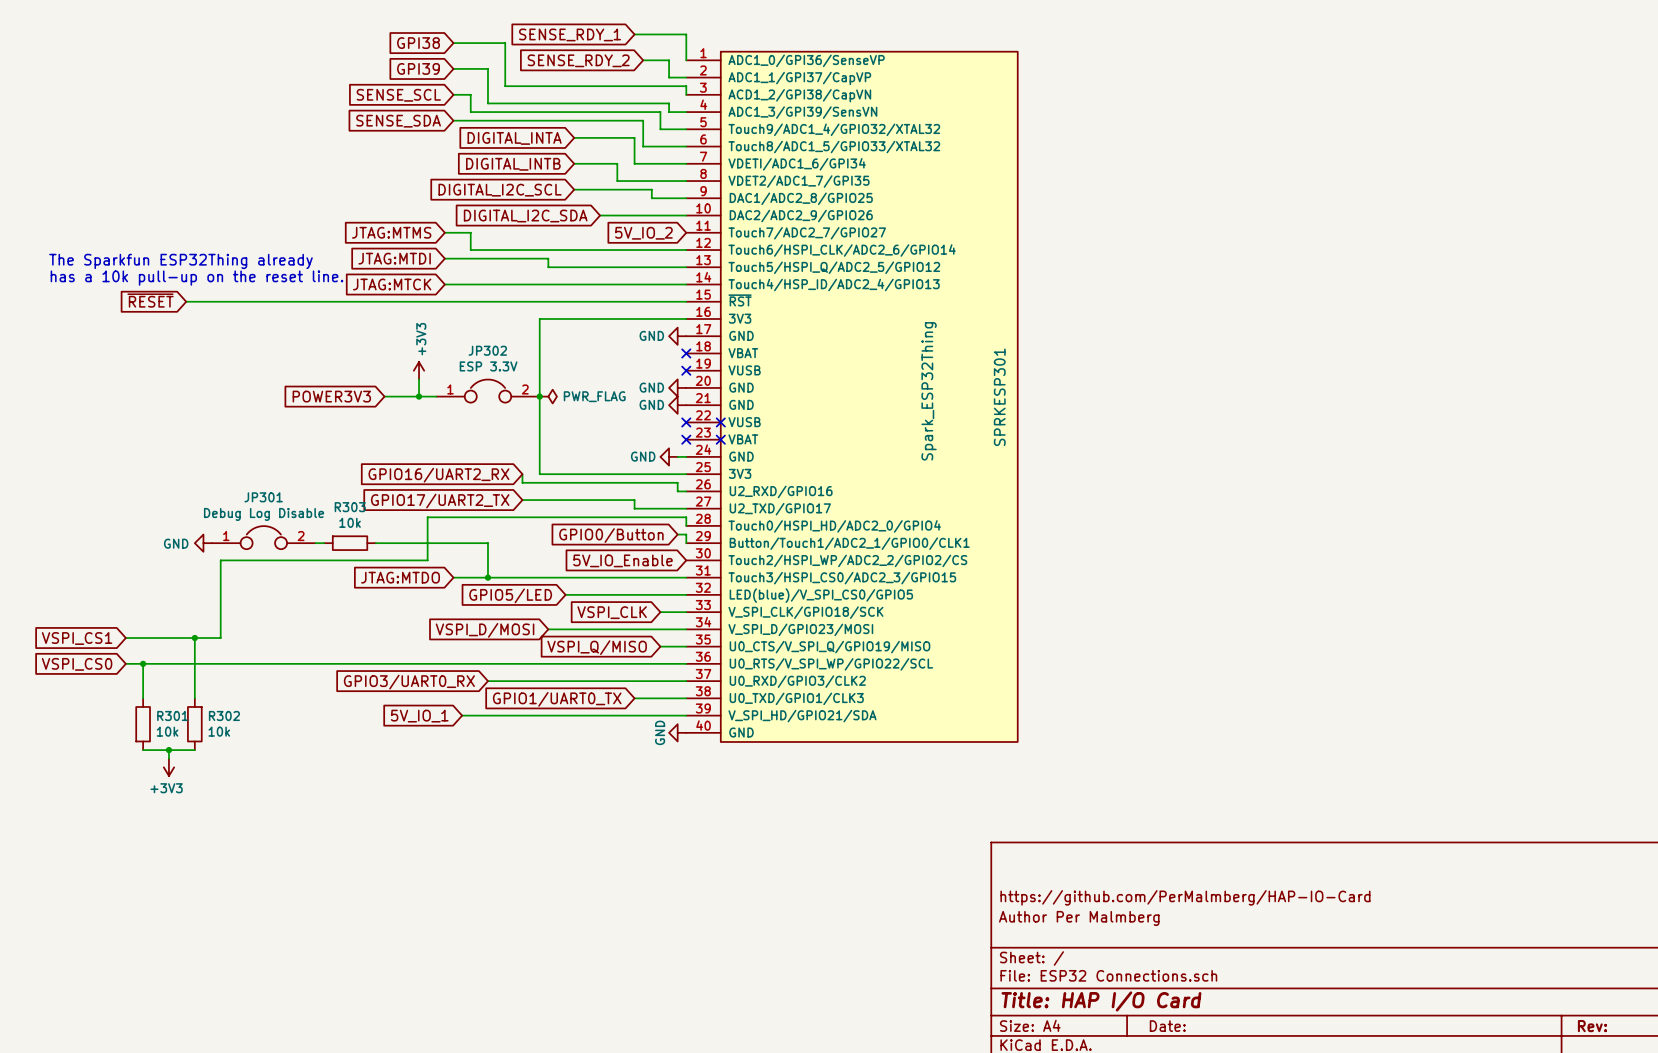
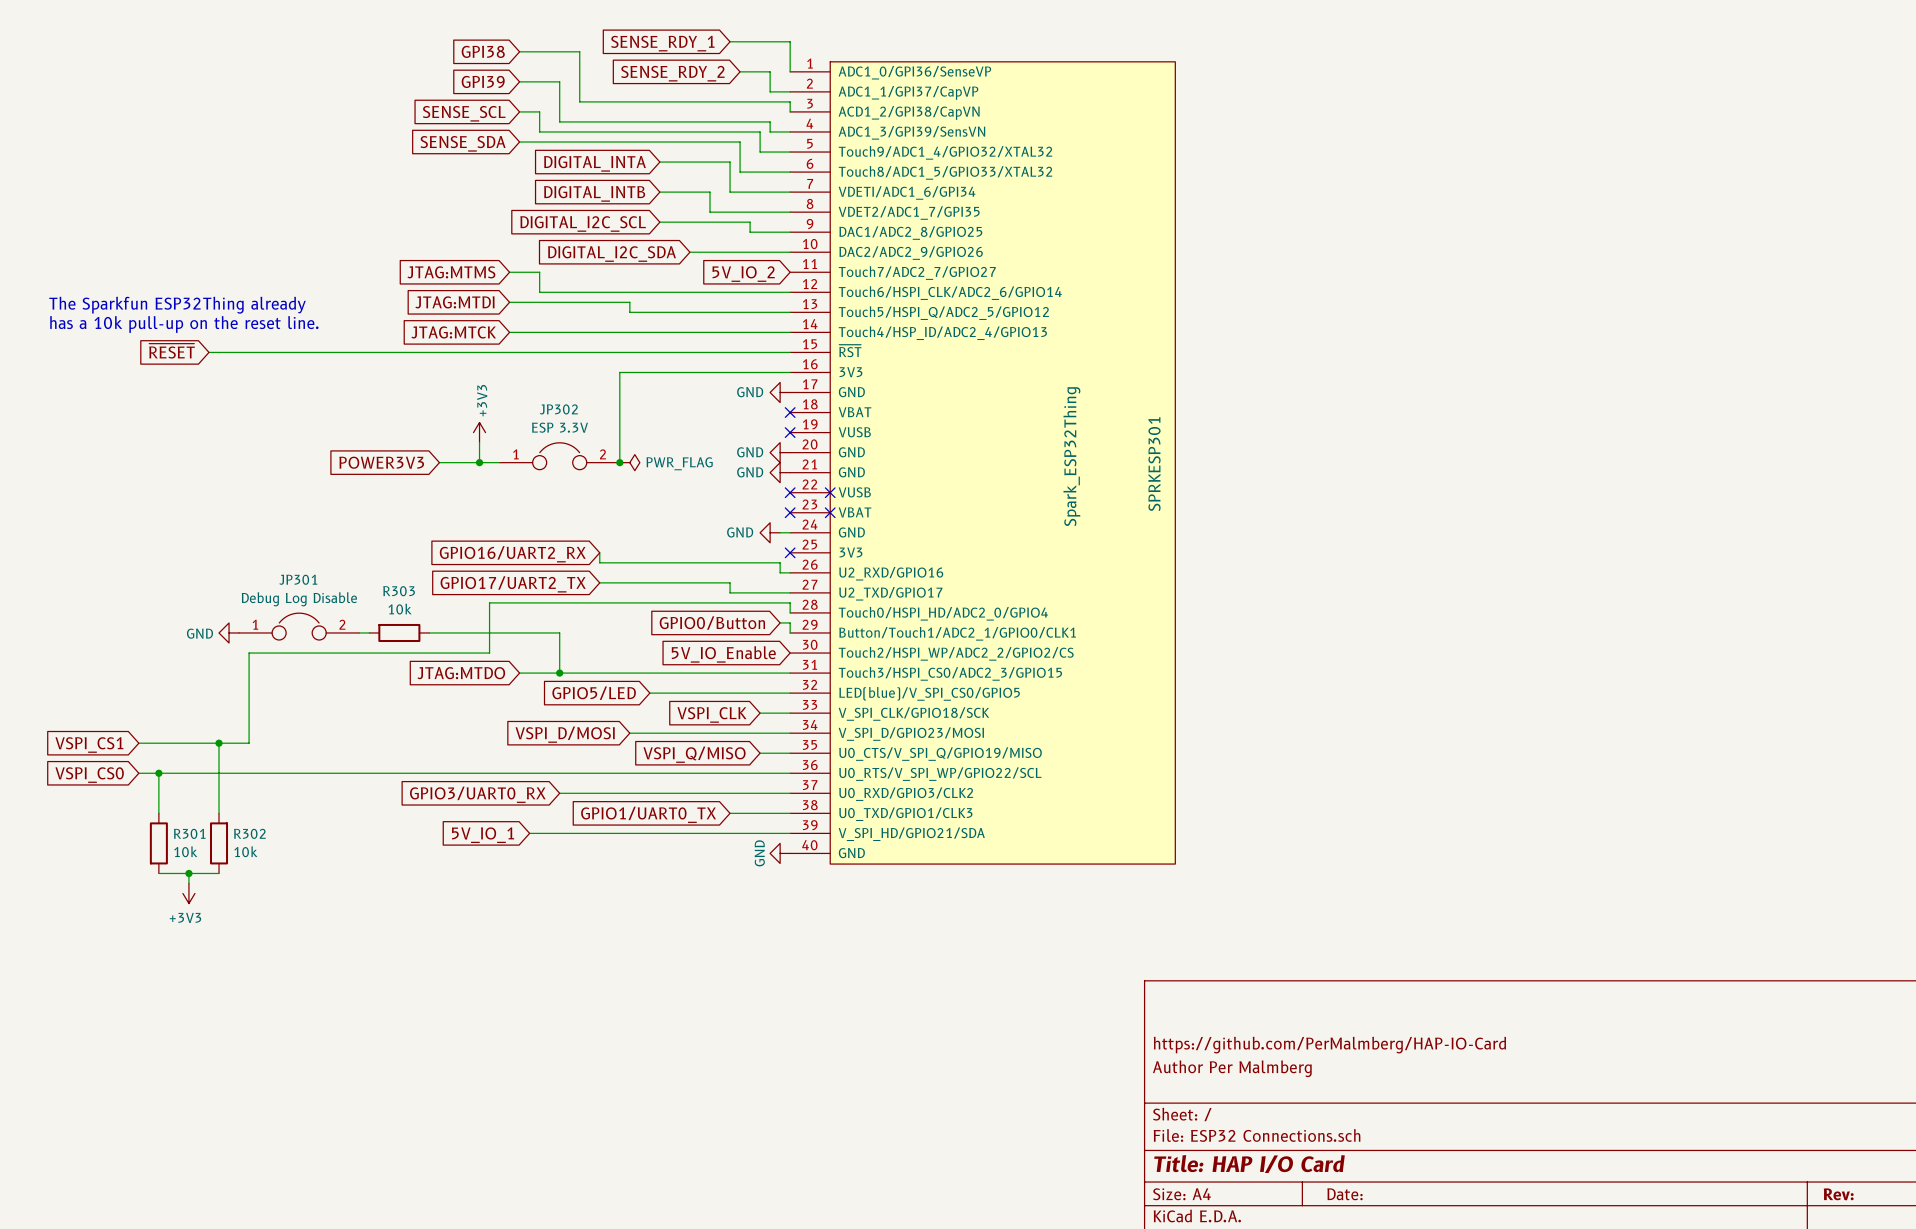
wire: (539, 396) (539, 474) (686, 474) -> none
no-connect mark: none -> (790, 552)

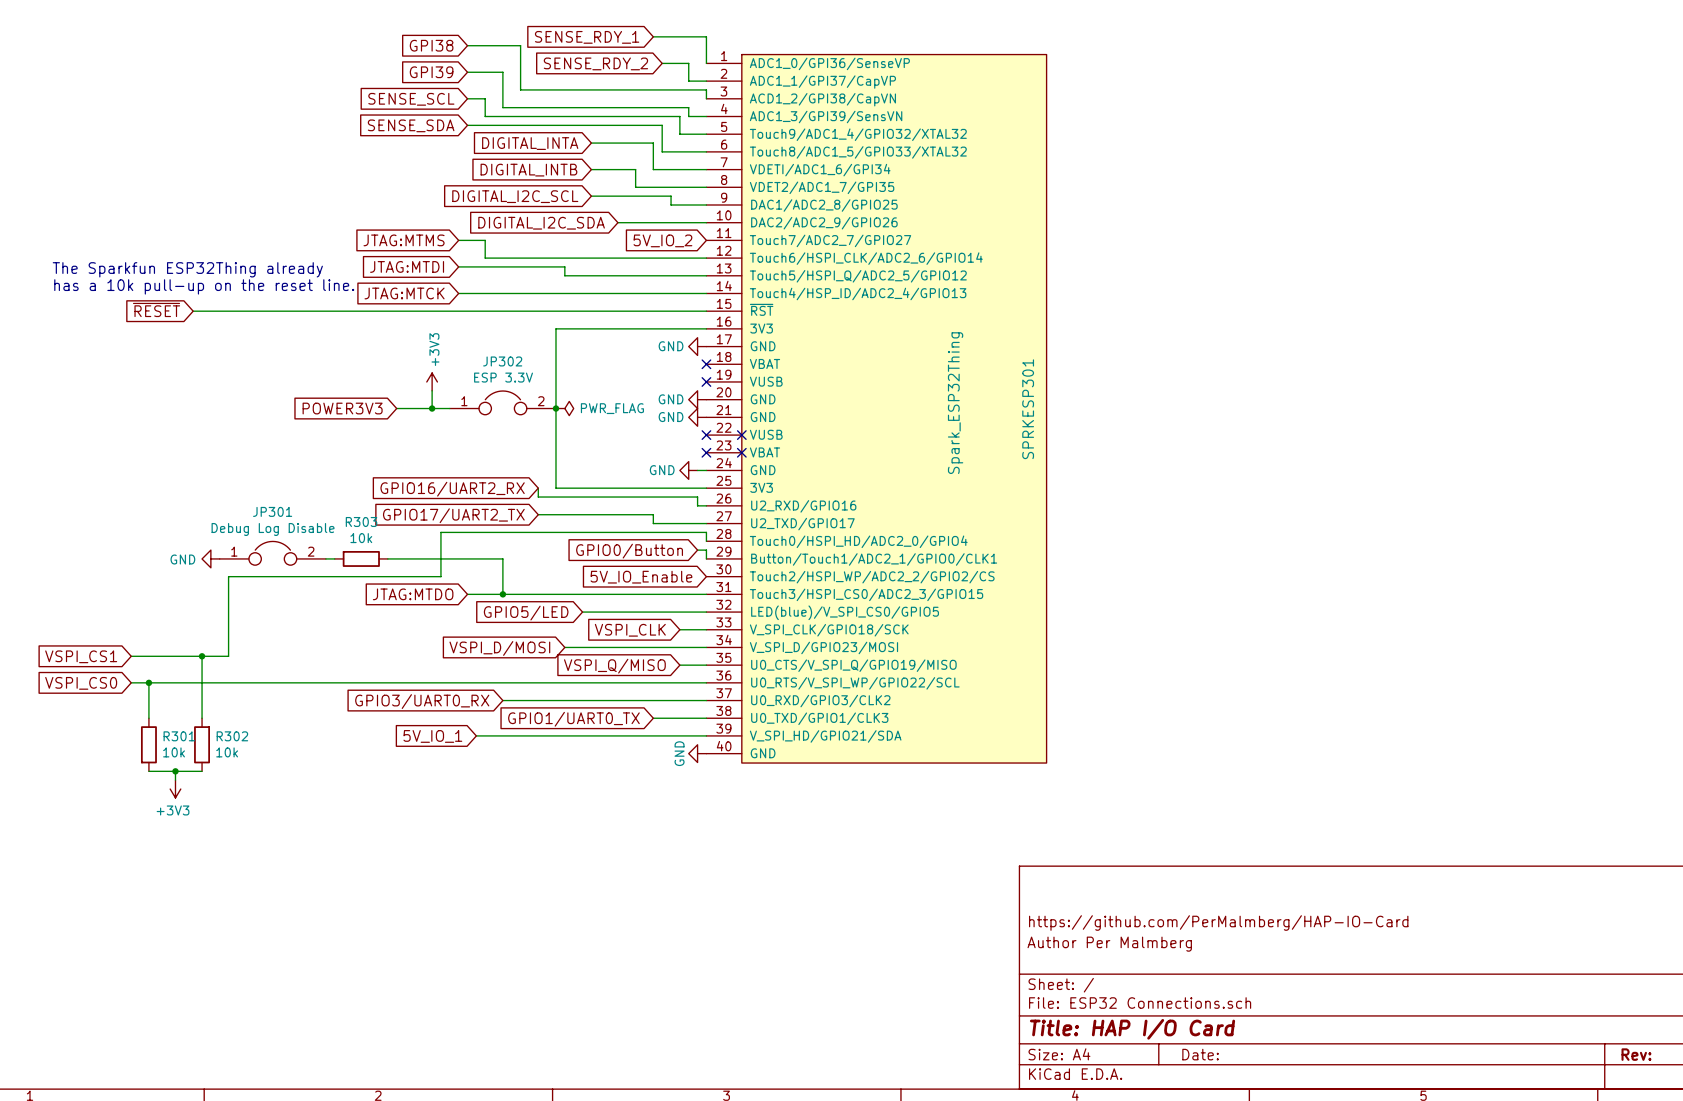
wire: none -> (555, 408) (555, 488) (706, 488)
no-connect mark: (790, 552) -> none

